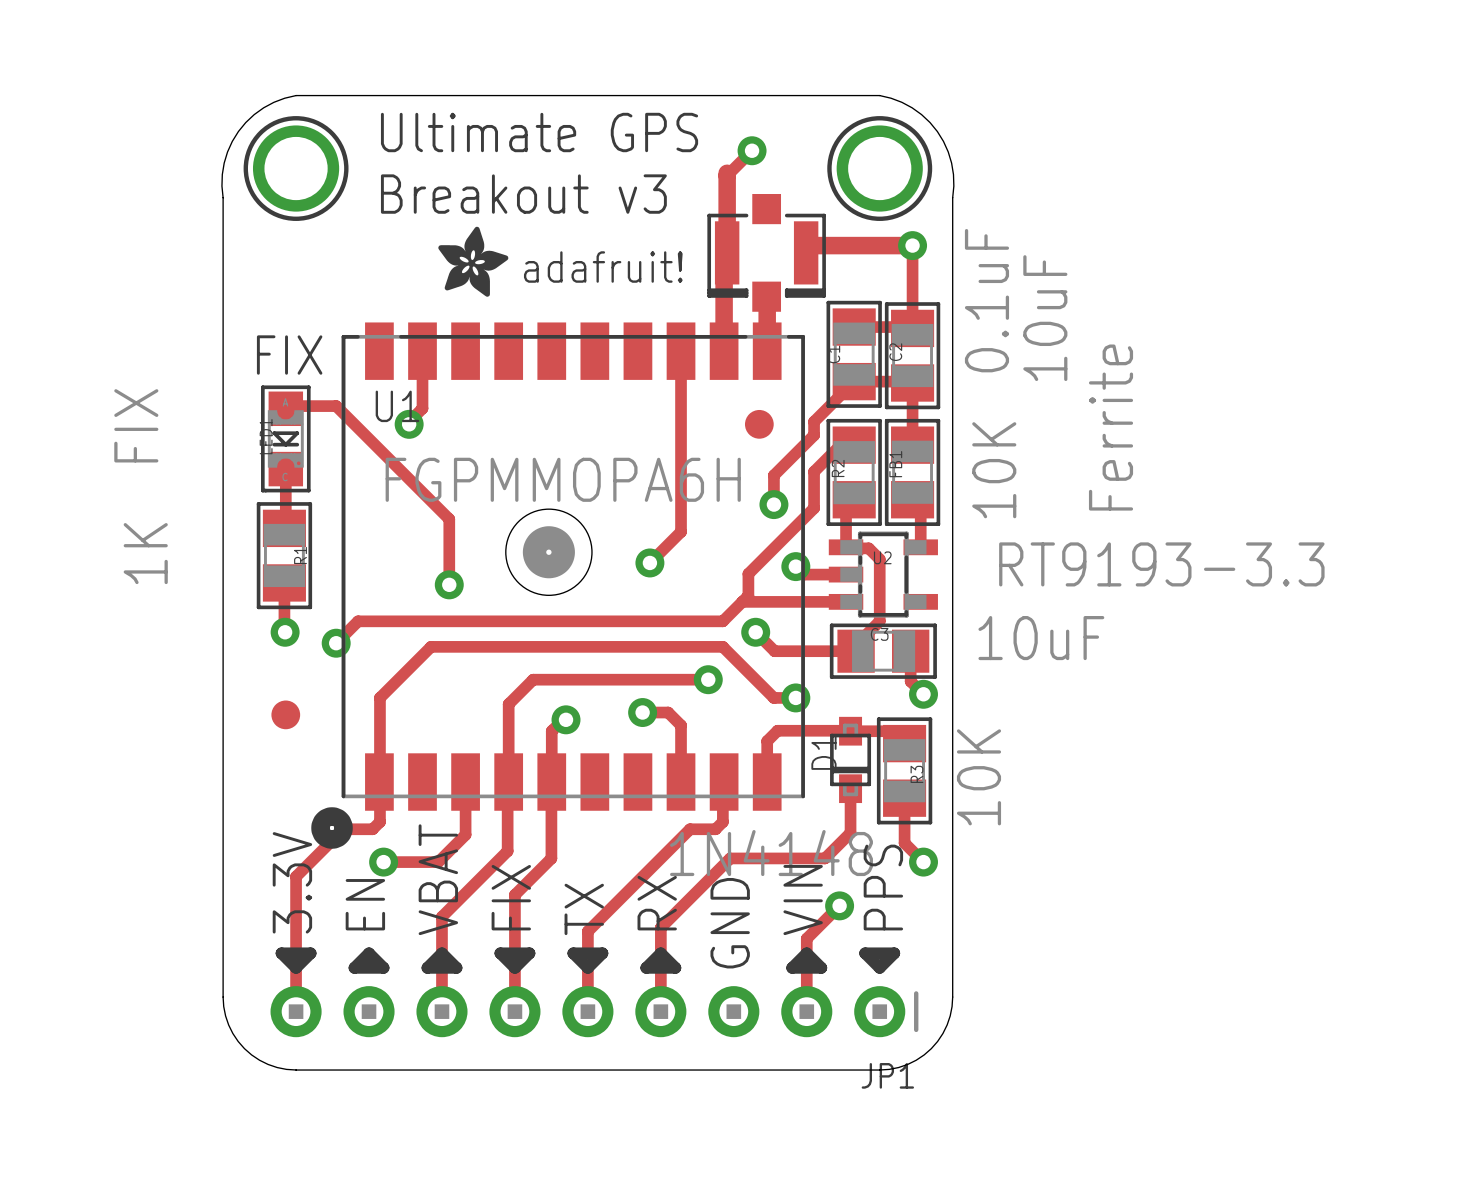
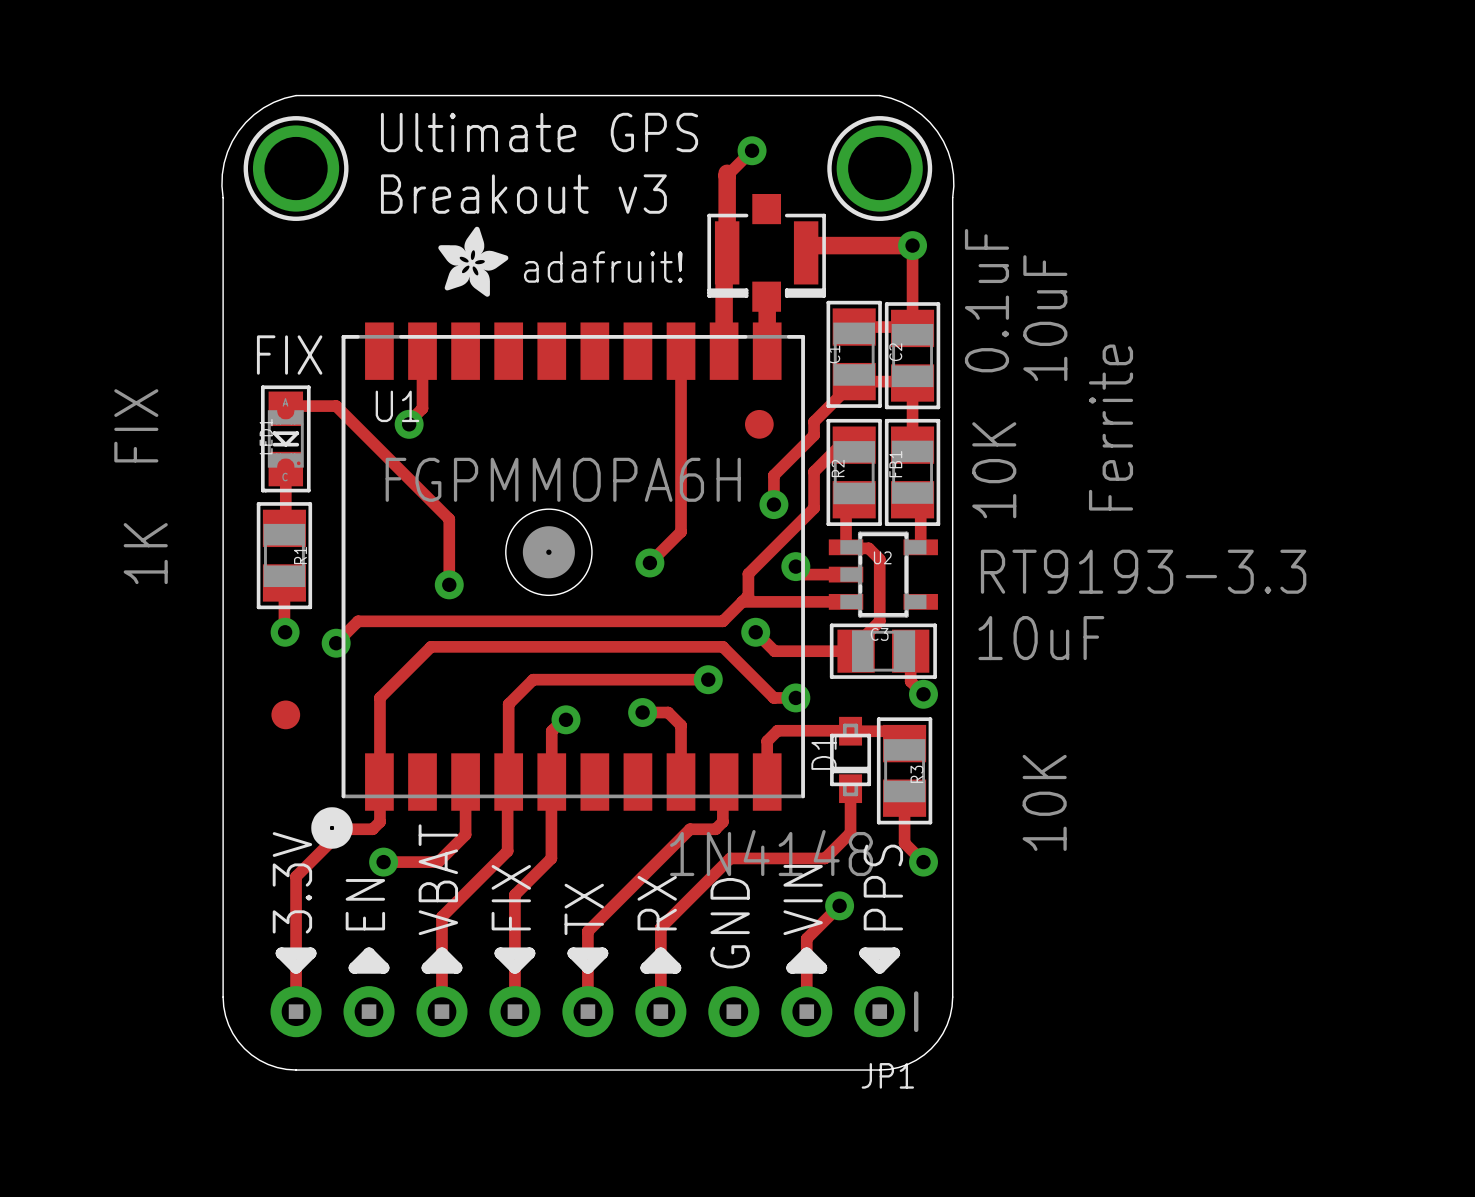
U2 value position: RT9193-3.3 (1161, 564) -> RT9193-3.3 (1143, 571)
R3 value position: 10K (978, 777) -> 10K (1044, 802)

